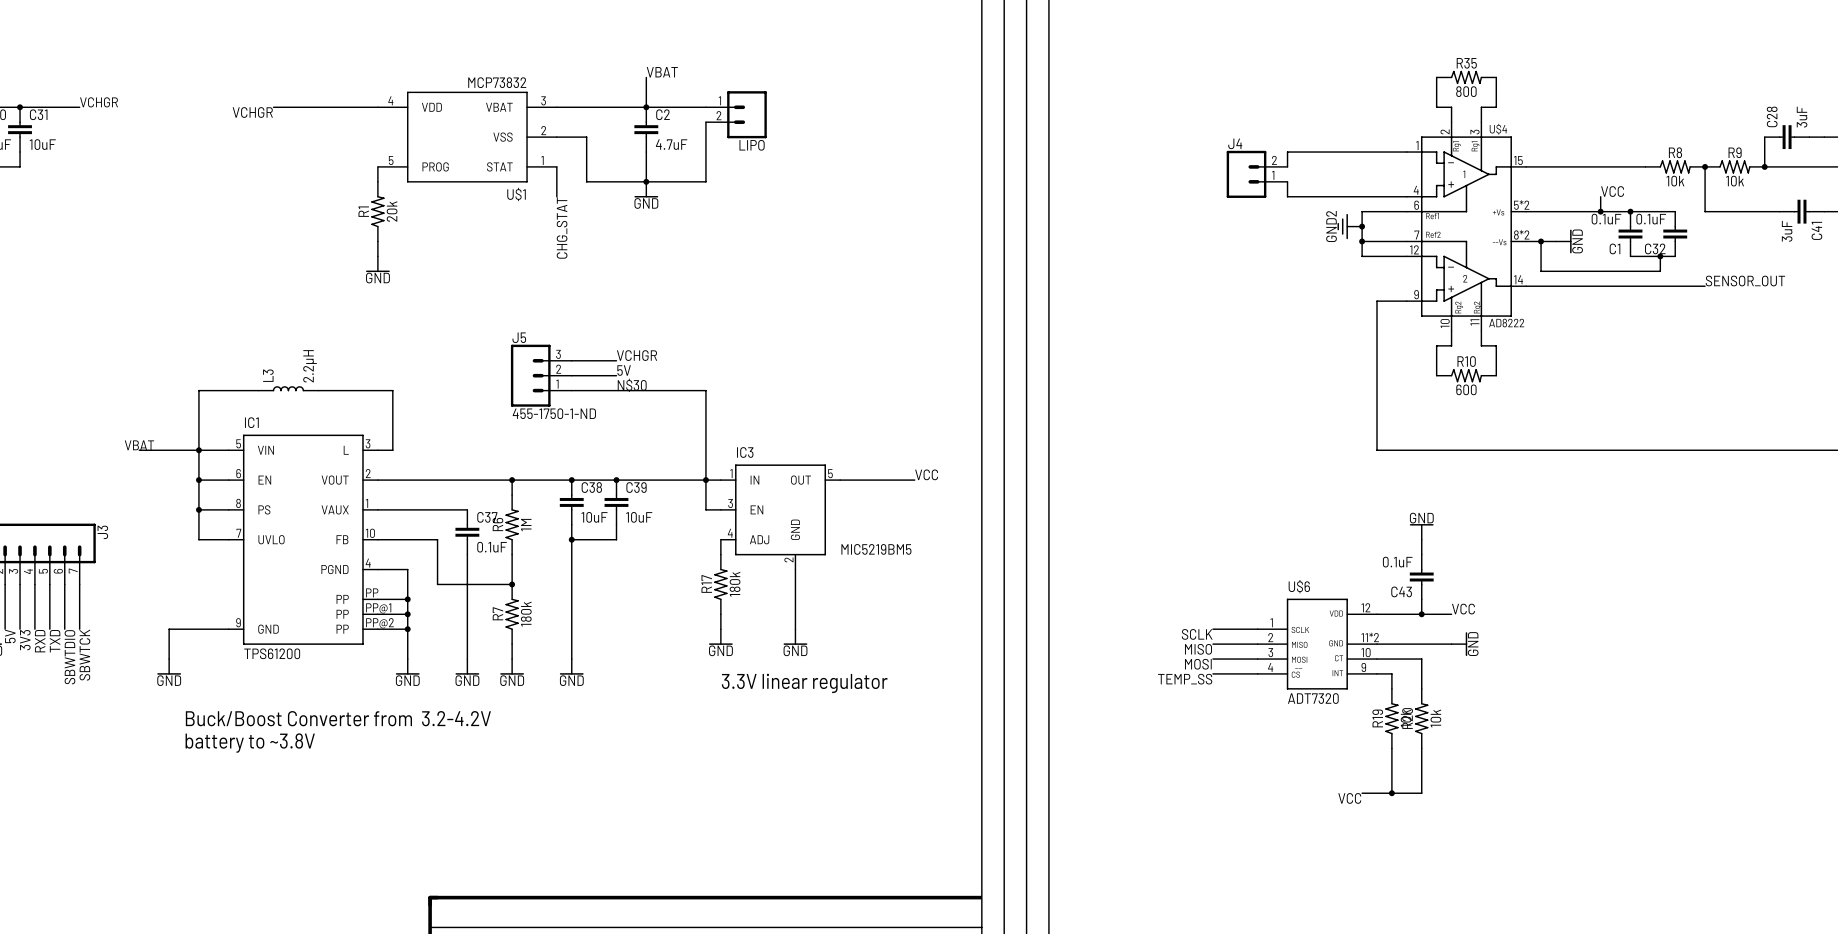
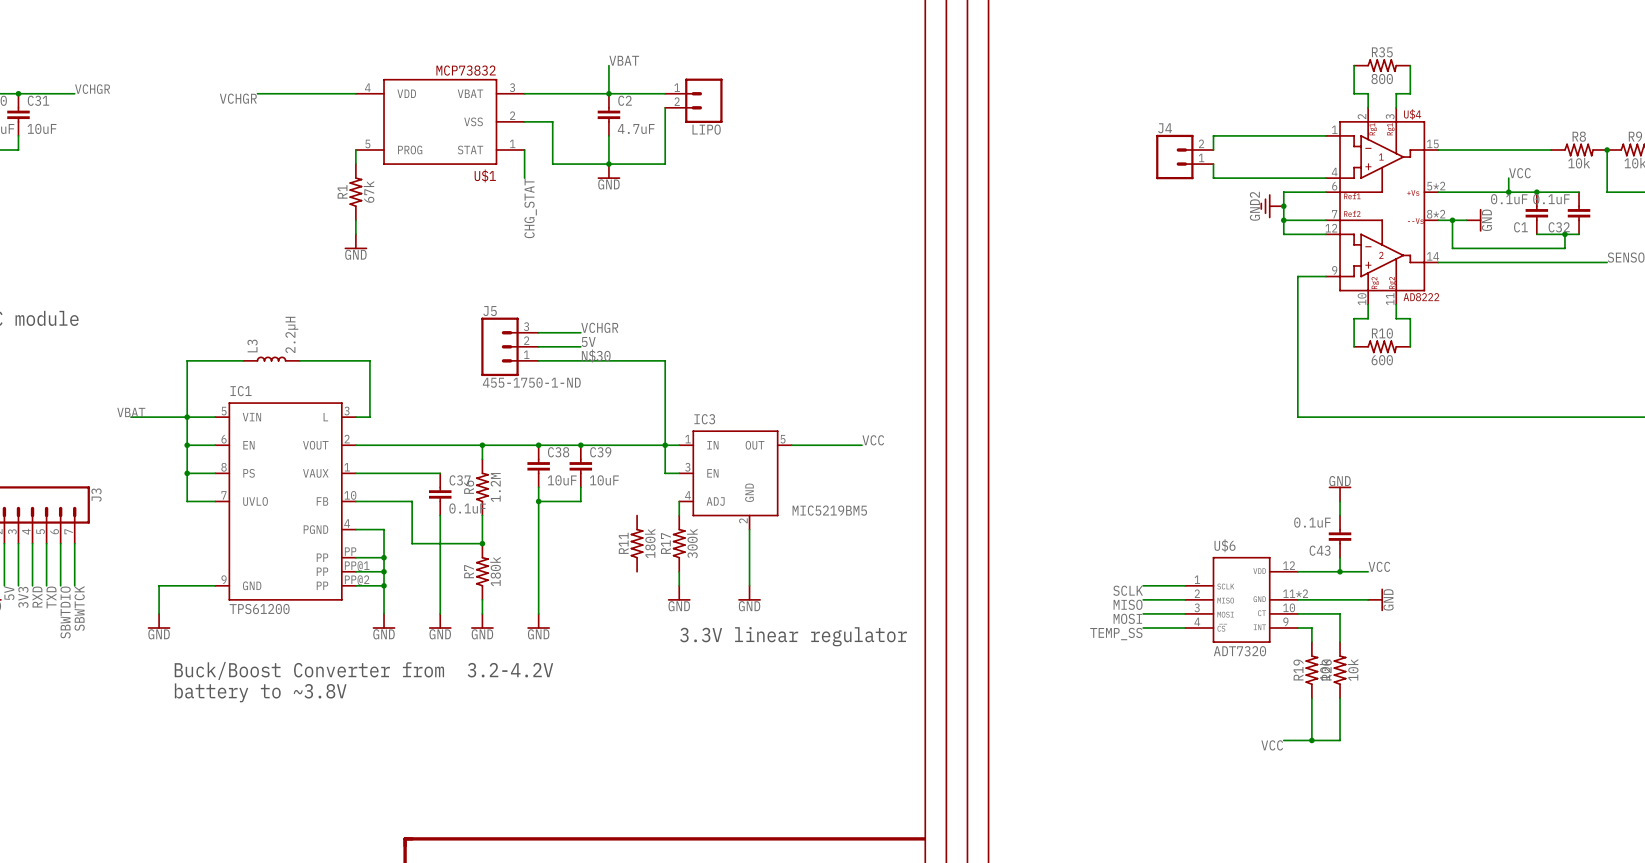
R1 value: 20k (392, 211) -> 67k (369, 191)
R6 value: 1M (526, 525) -> 1.2M (495, 487)
R11: none -> 180k (637, 543)
R17 value: 180k (735, 584) -> 300k (692, 543)

